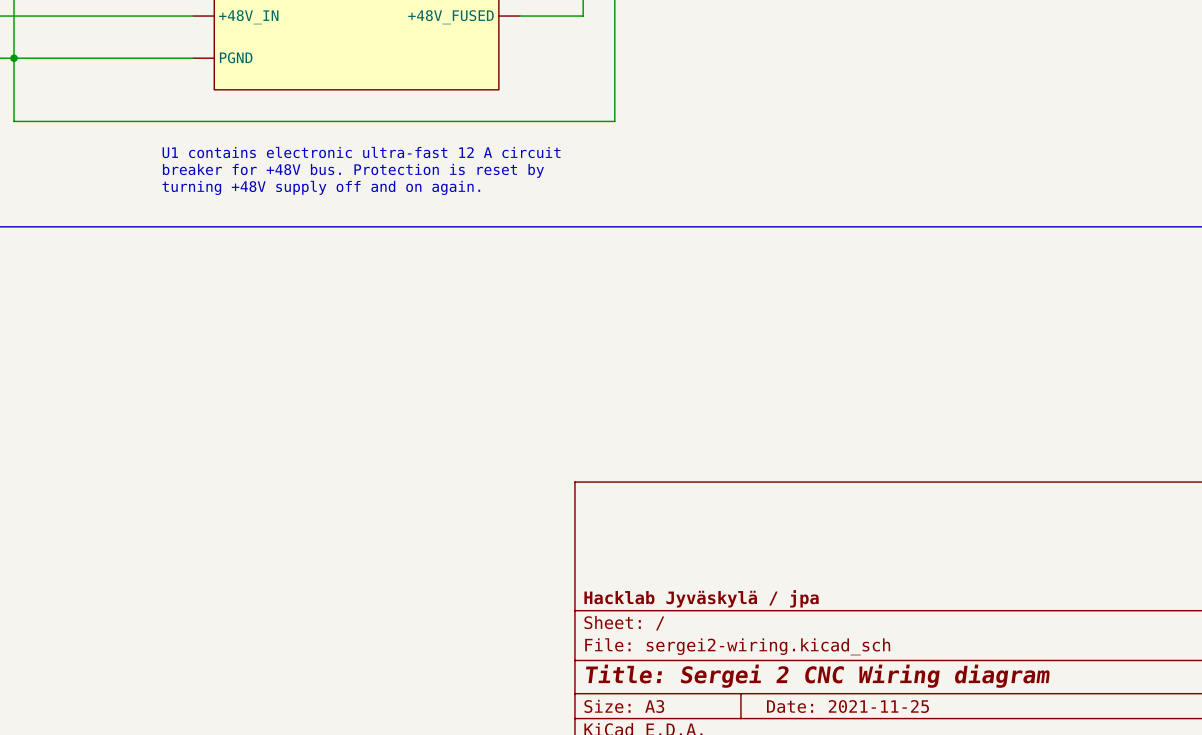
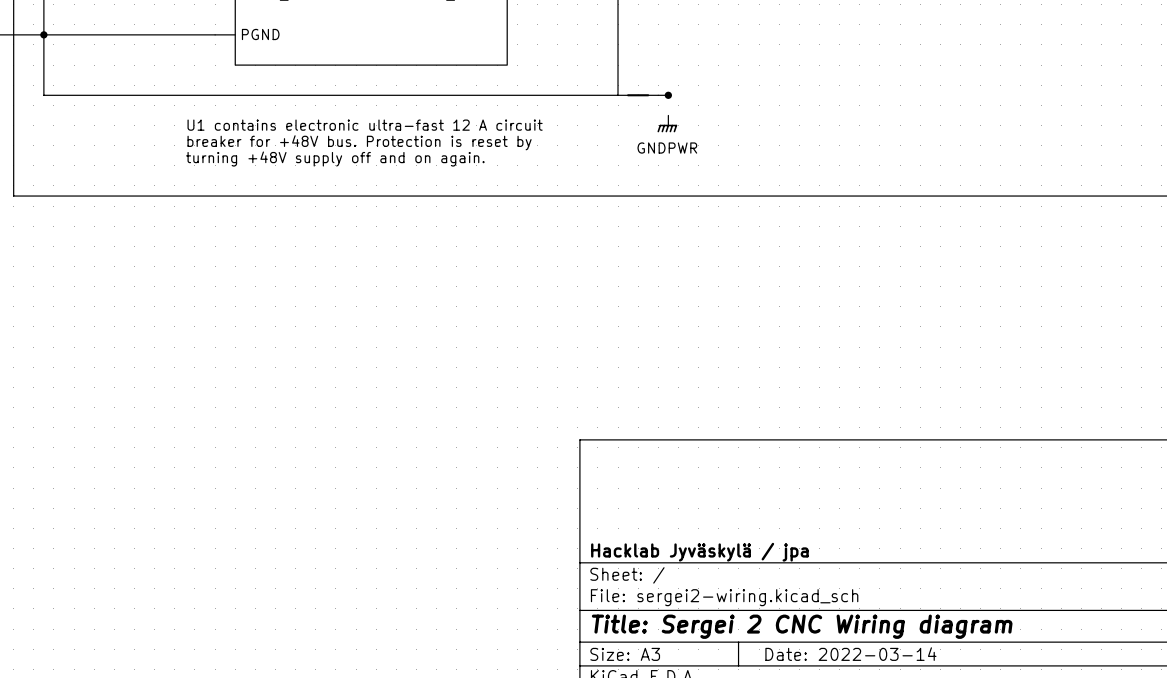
part: none -> (638, 95)
wire: none -> (658, 95) (668, 95)
junction: none -> (668, 95)
power symbol: none -> GNDPWR (667, 123)
title block: Date: 2021-11-25 (847, 706) -> Date: 2022-03-14 (850, 654)

